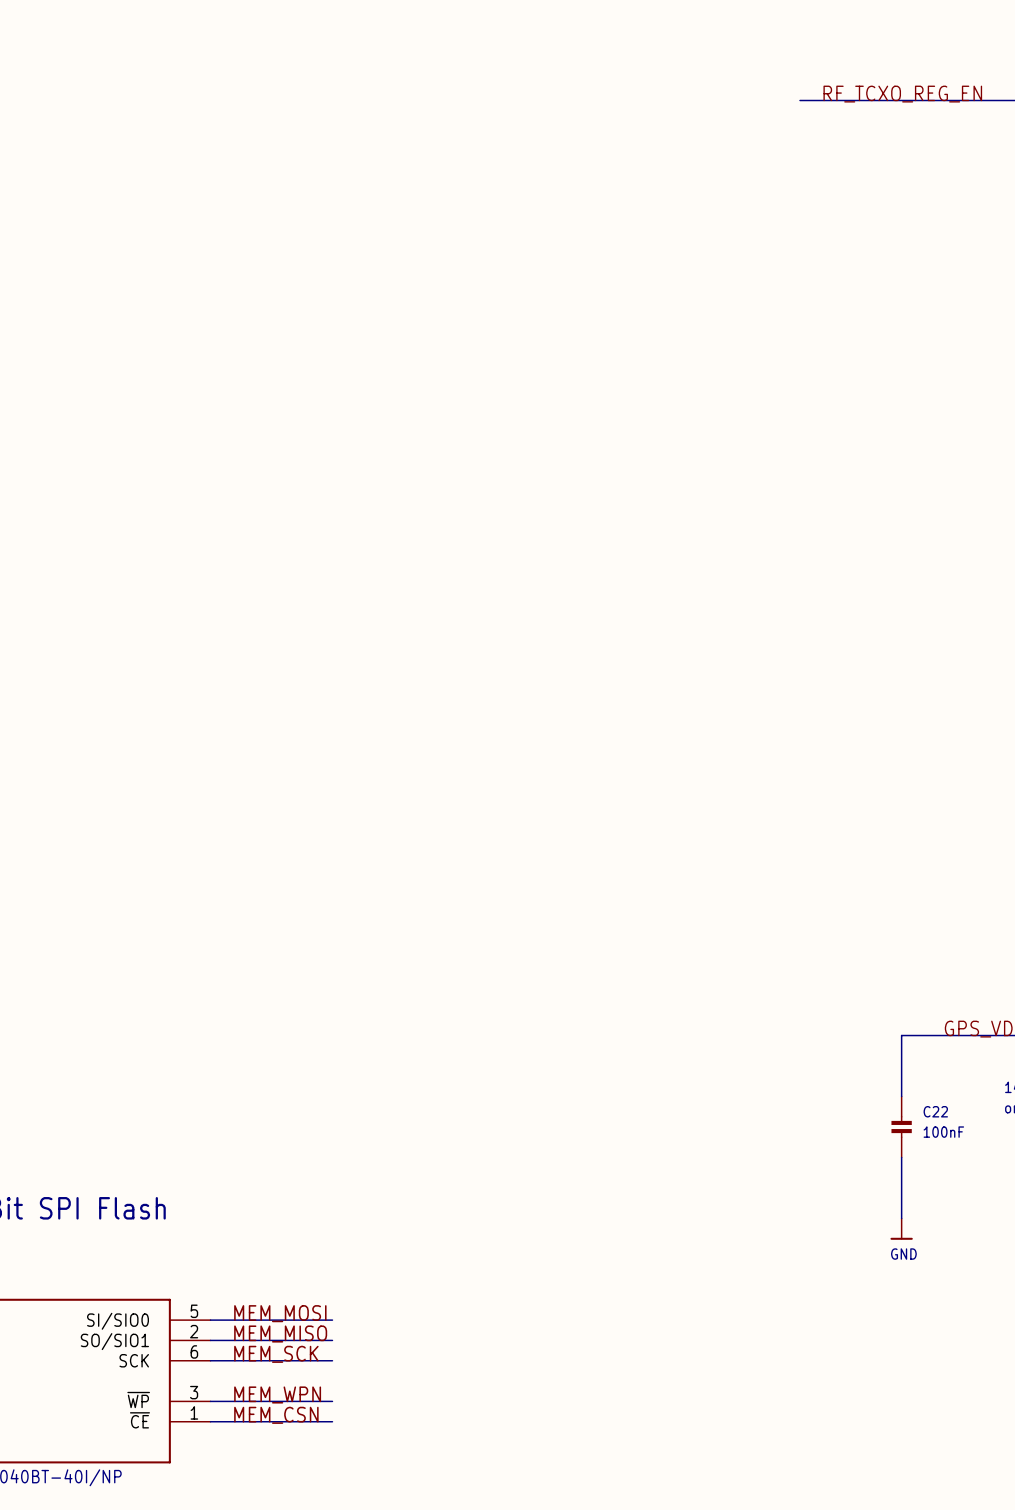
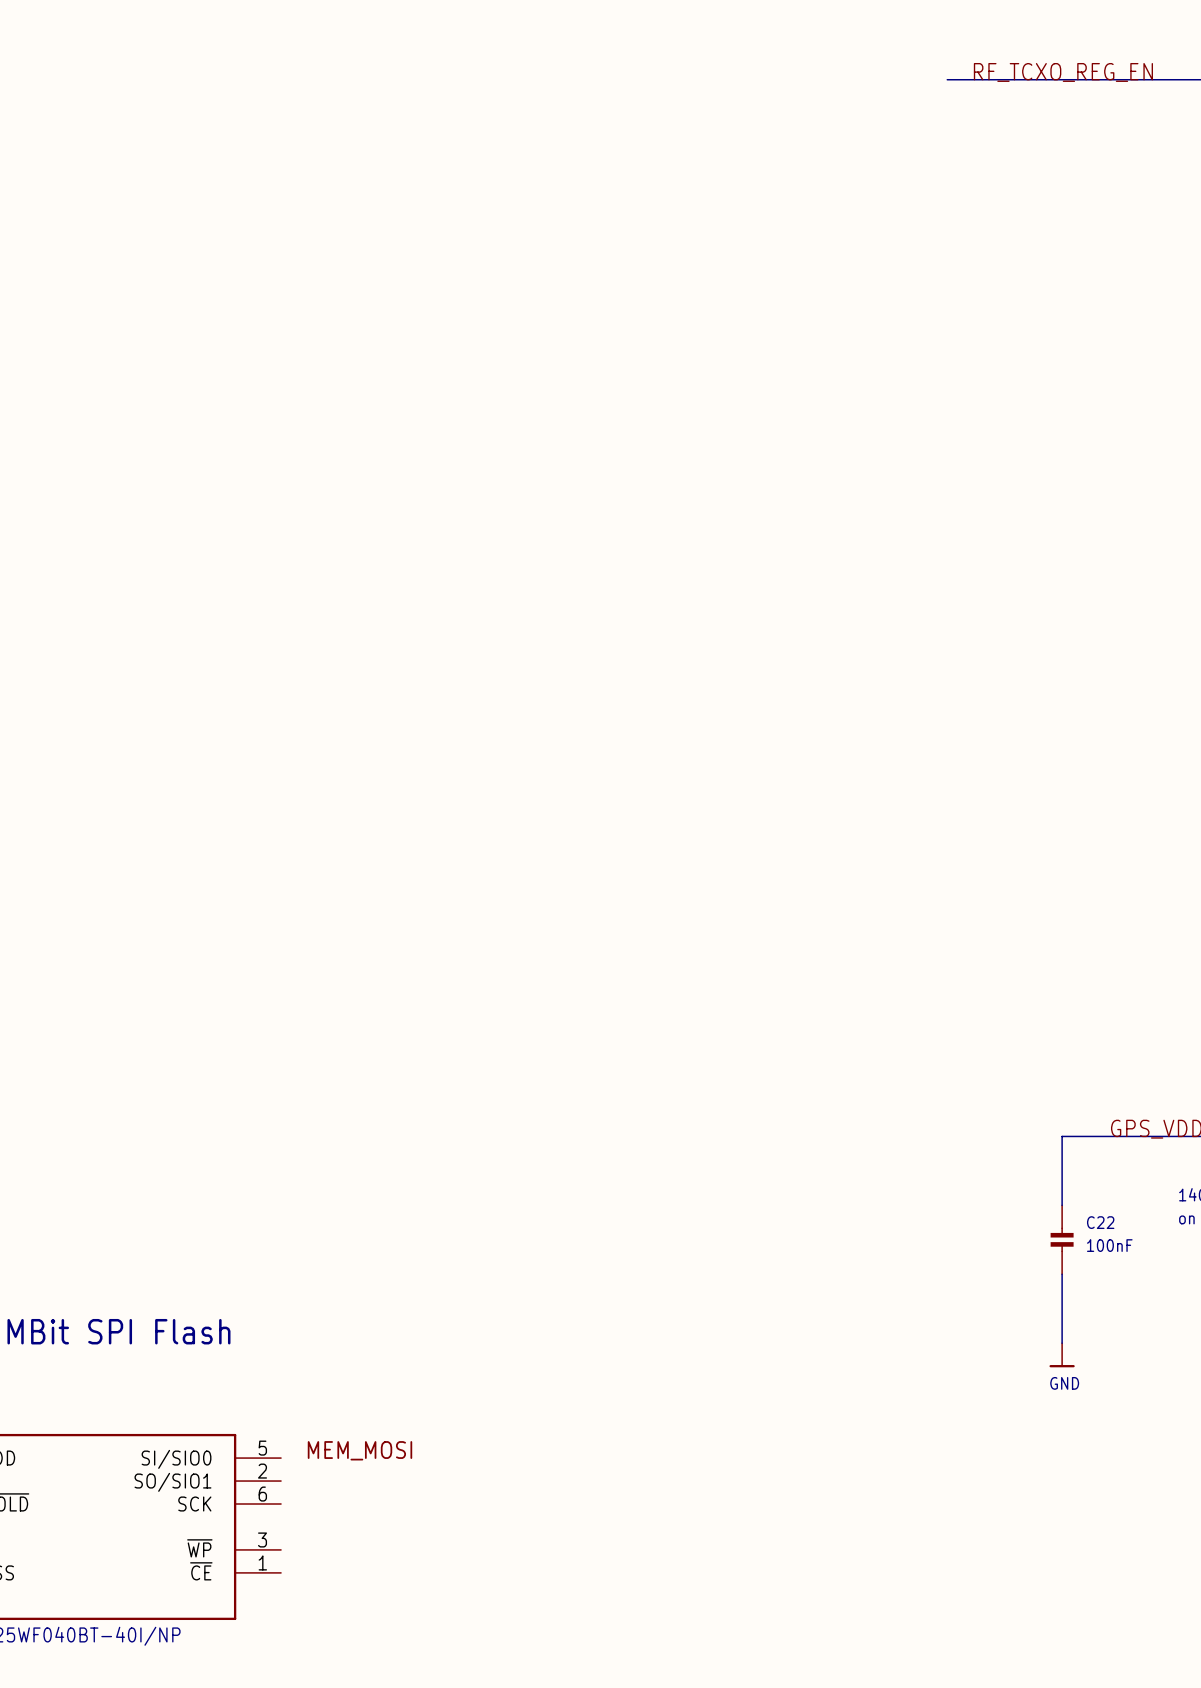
wire: (210, 1320) (332, 1320) -> none
label: MEM_MISO (280, 1333) -> none
wire: (210, 1340) (332, 1340) -> none
label: MEM_SCK (276, 1354) -> none
wire: (210, 1360) (332, 1360) -> none
label: MEM_WPN (277, 1394) -> none
wire: (210, 1401) (332, 1401) -> none
label: MEM_CSN (276, 1415) -> none
wire: (210, 1421) (332, 1421) -> none

